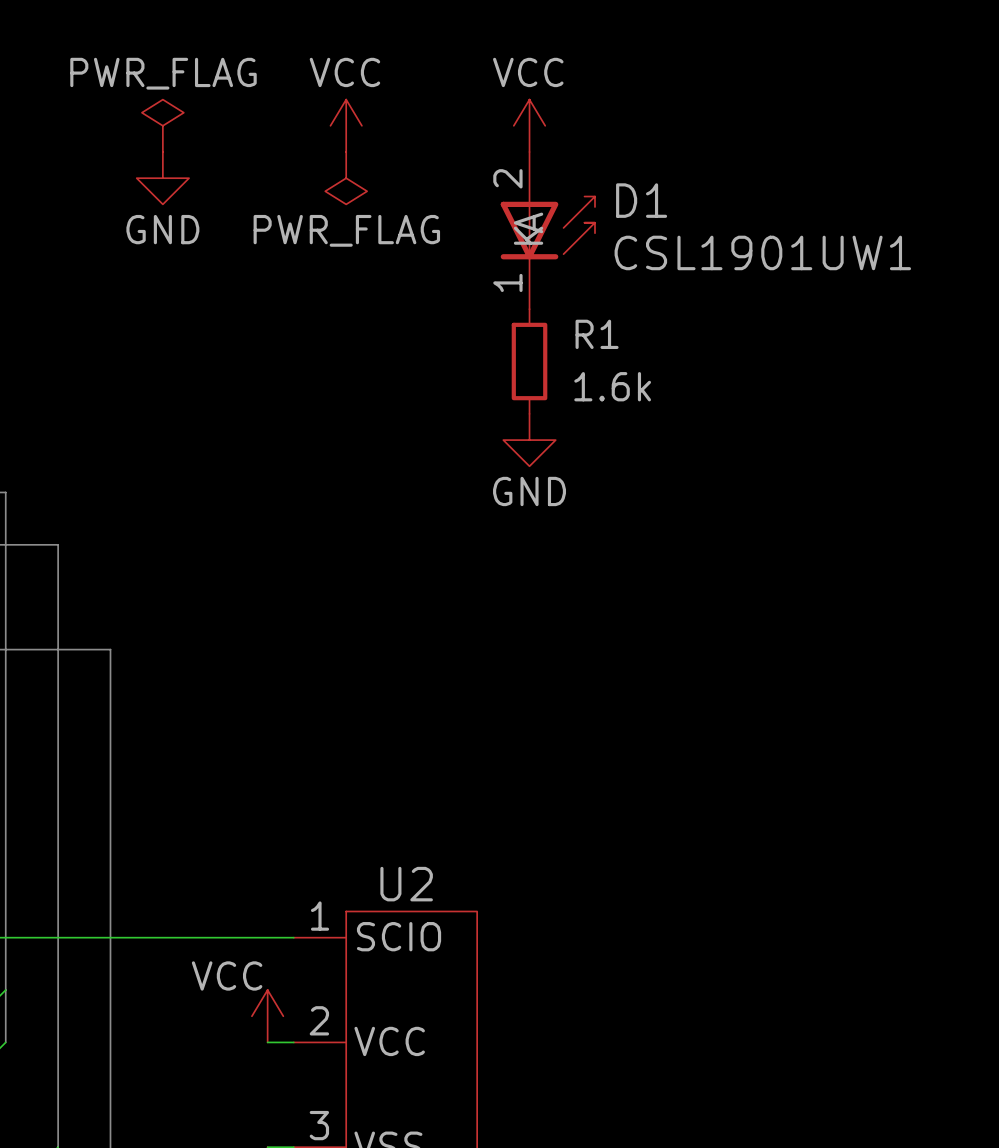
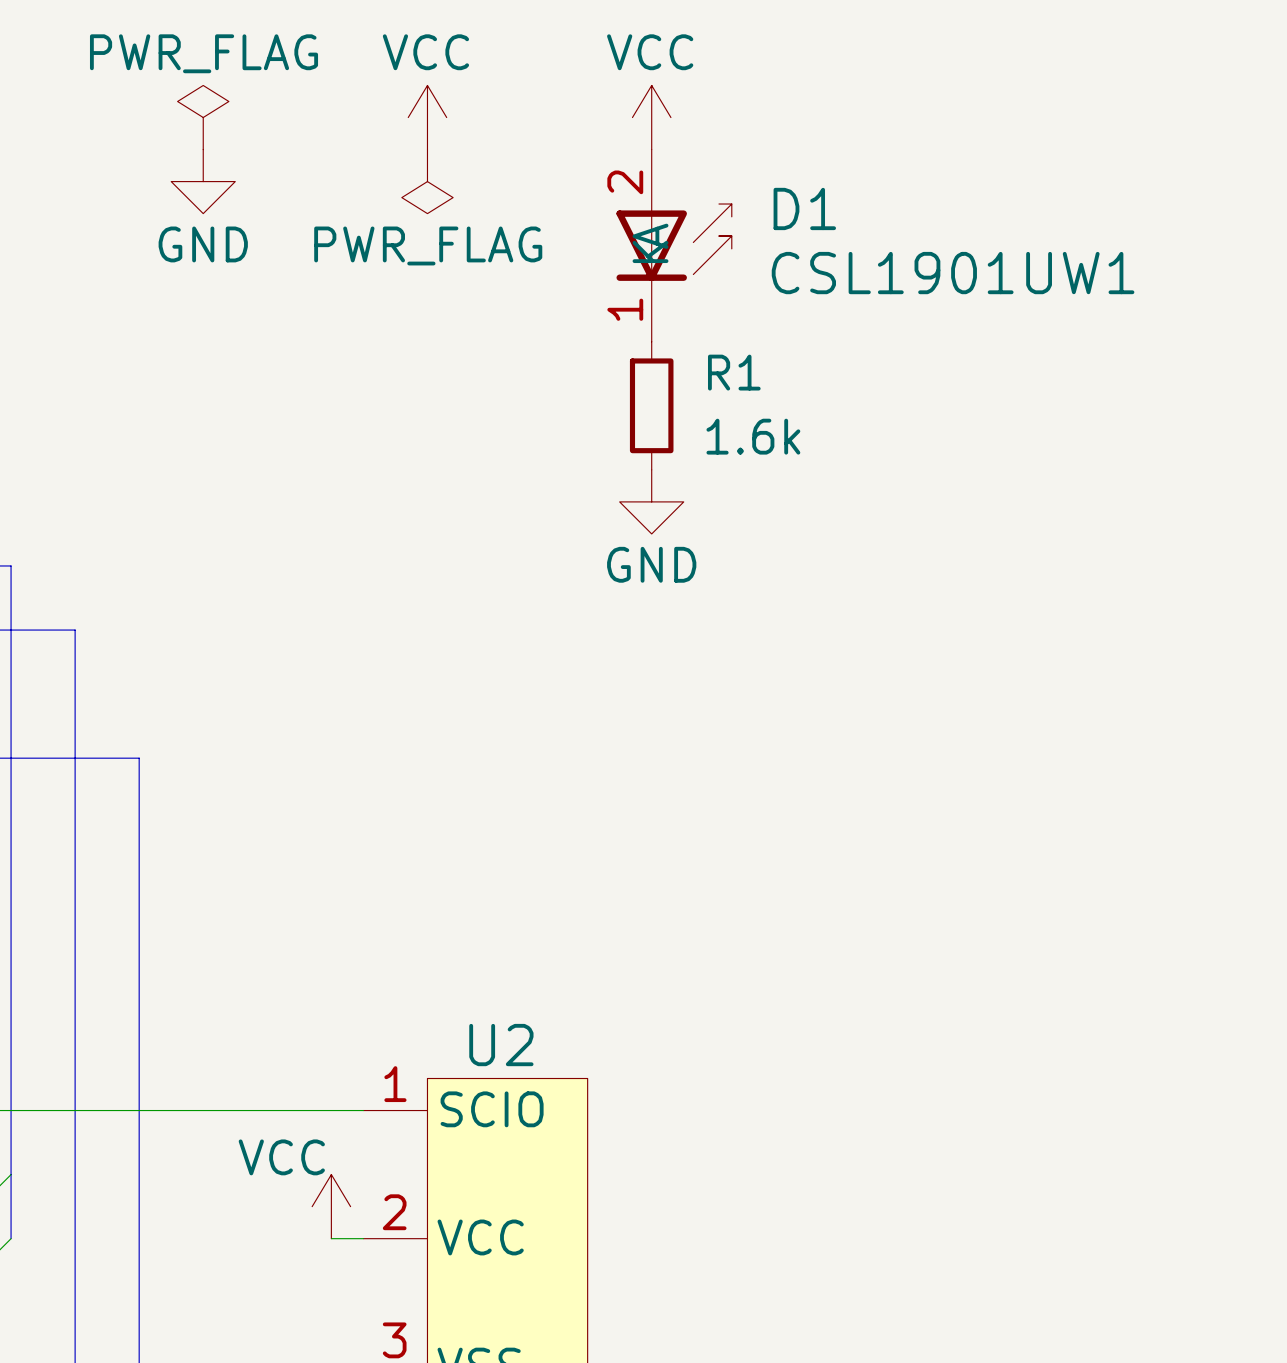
D1 name position: D1 (641, 200) -> D1 (804, 208)
D1 value position: CSL1901UW1 (762, 252) -> CSL1901UW1 (953, 273)

